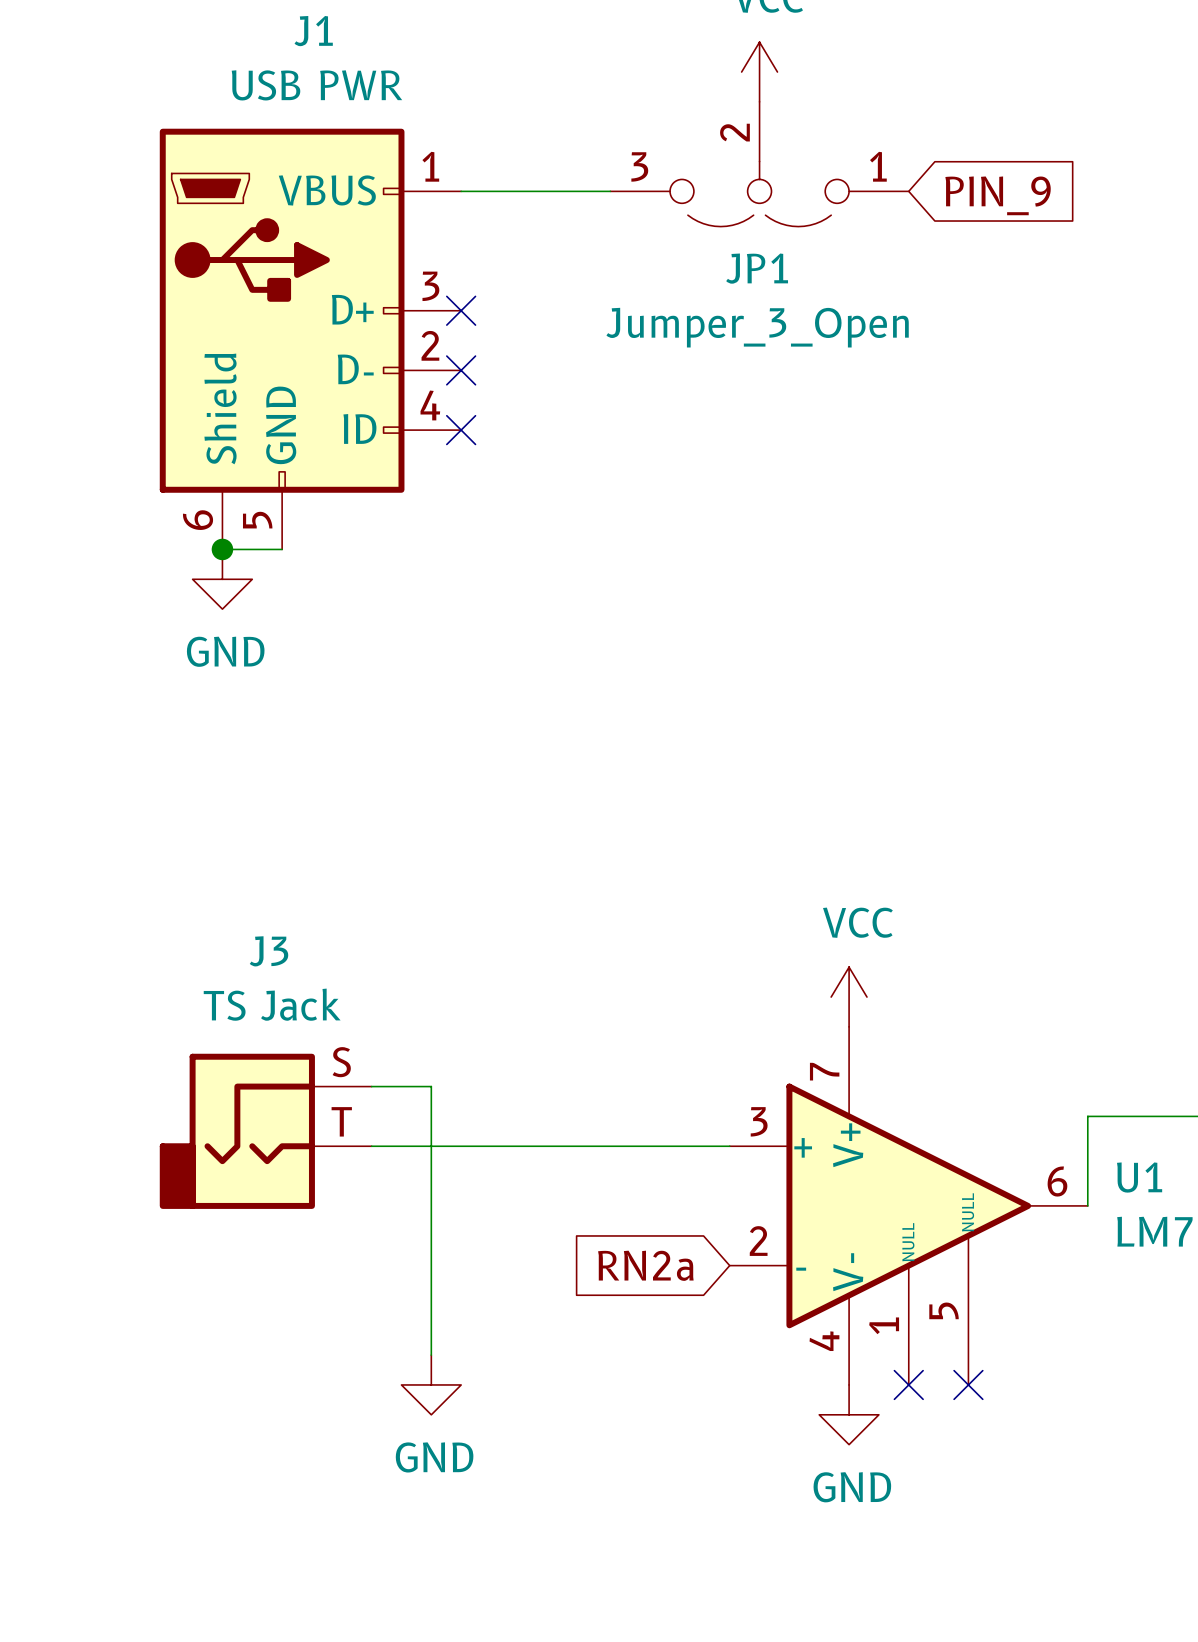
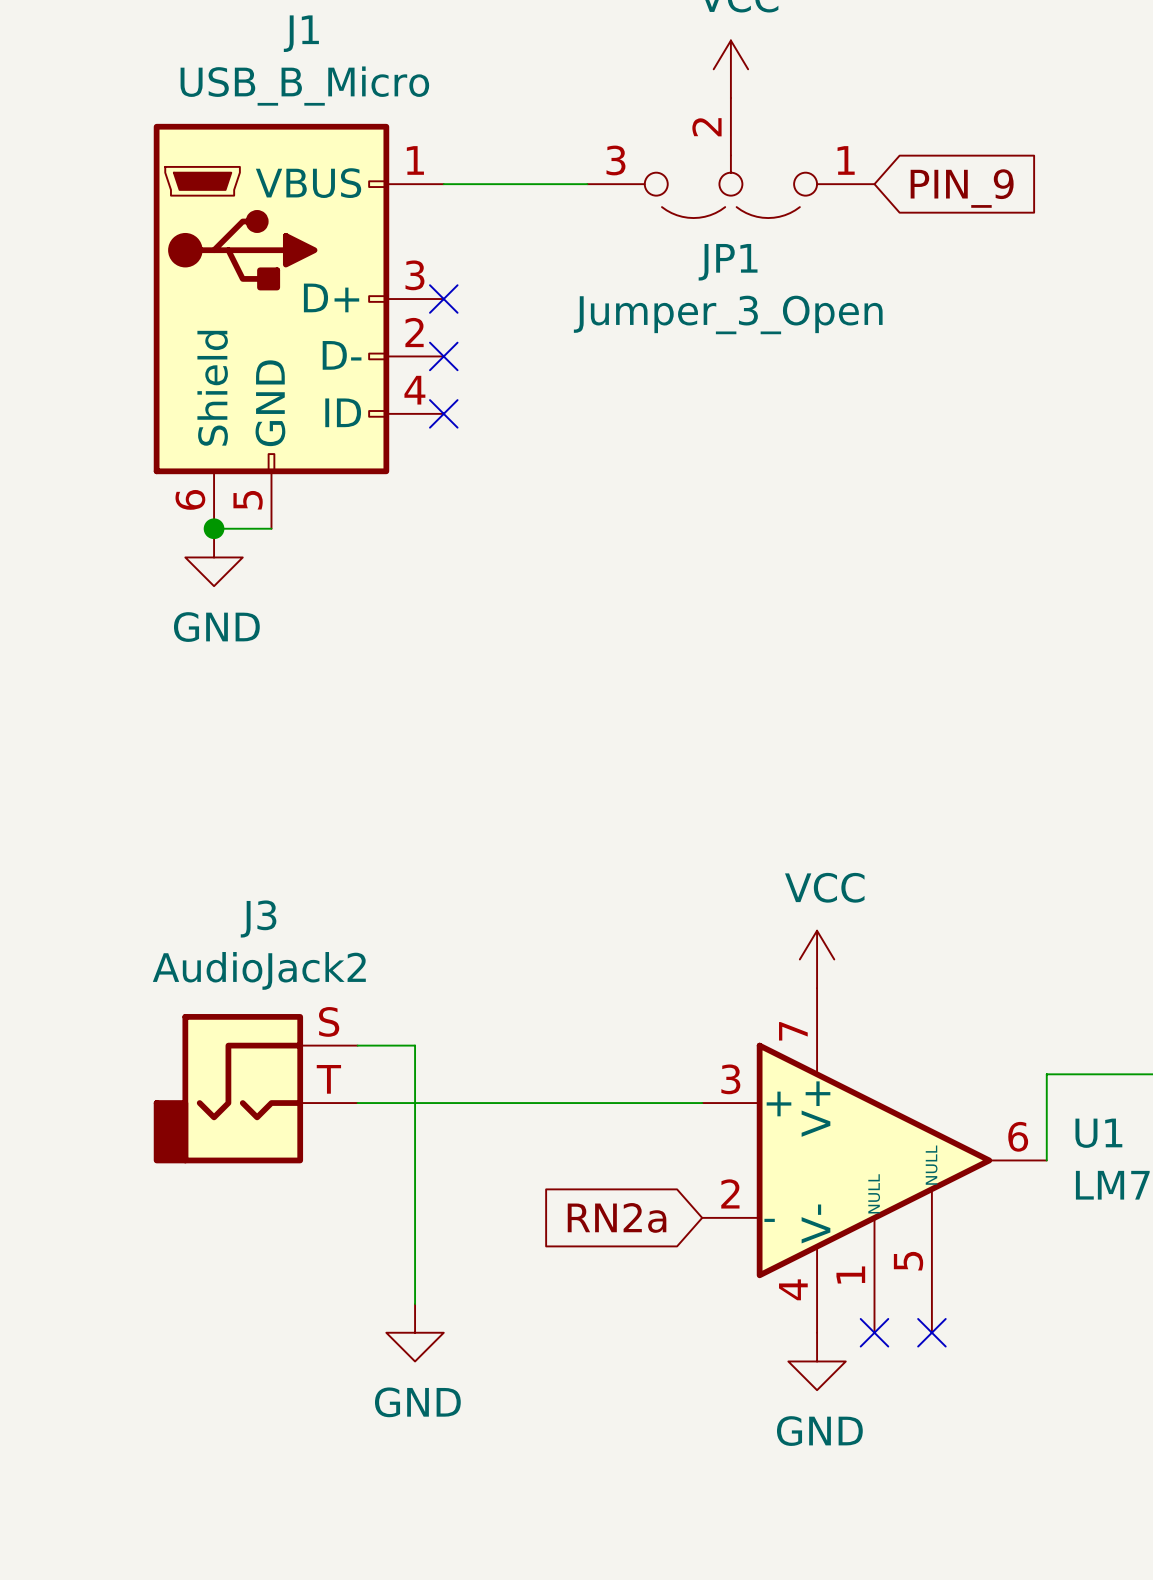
J1 value: USB PWR (316, 85) -> USB_B_Micro (304, 86)
J3 value: TS Jack (272, 1004) -> AudioJack2 (259, 970)

